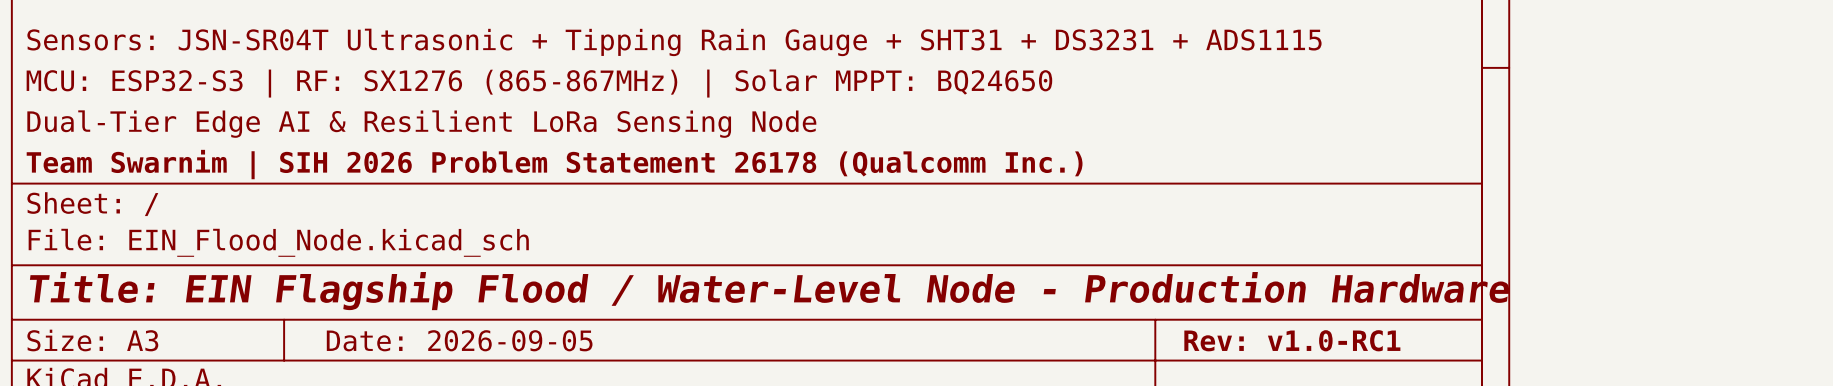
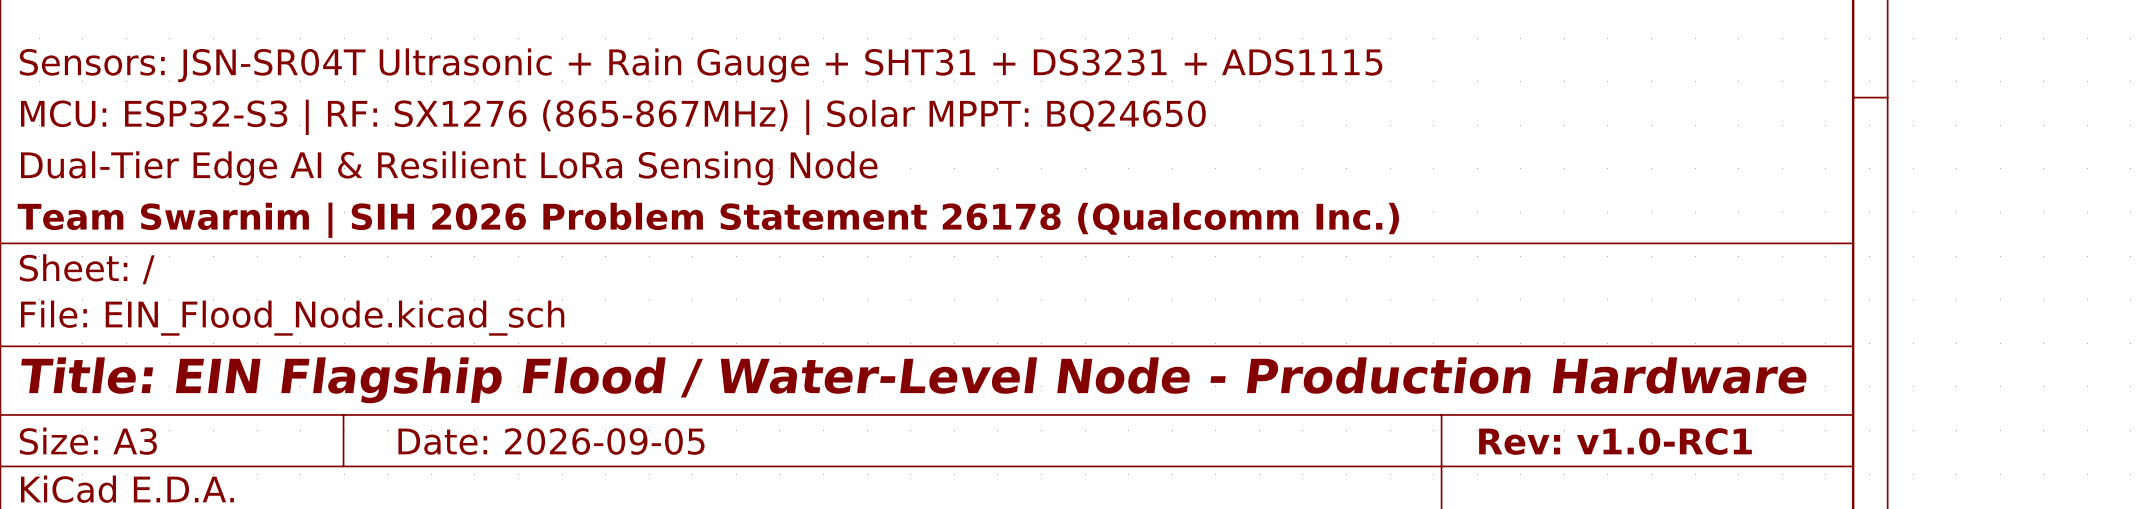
title block: Sensors: JSN-SR04T Ultrasonic + Tipping Rain Gauge + SHT31 + DS3231 + ADS1115 (674, 42) -> Sensors: JSN-SR04T Ultrasonic + Rain Gauge + SHT31 + DS3231 + ADS1115 (701, 65)

